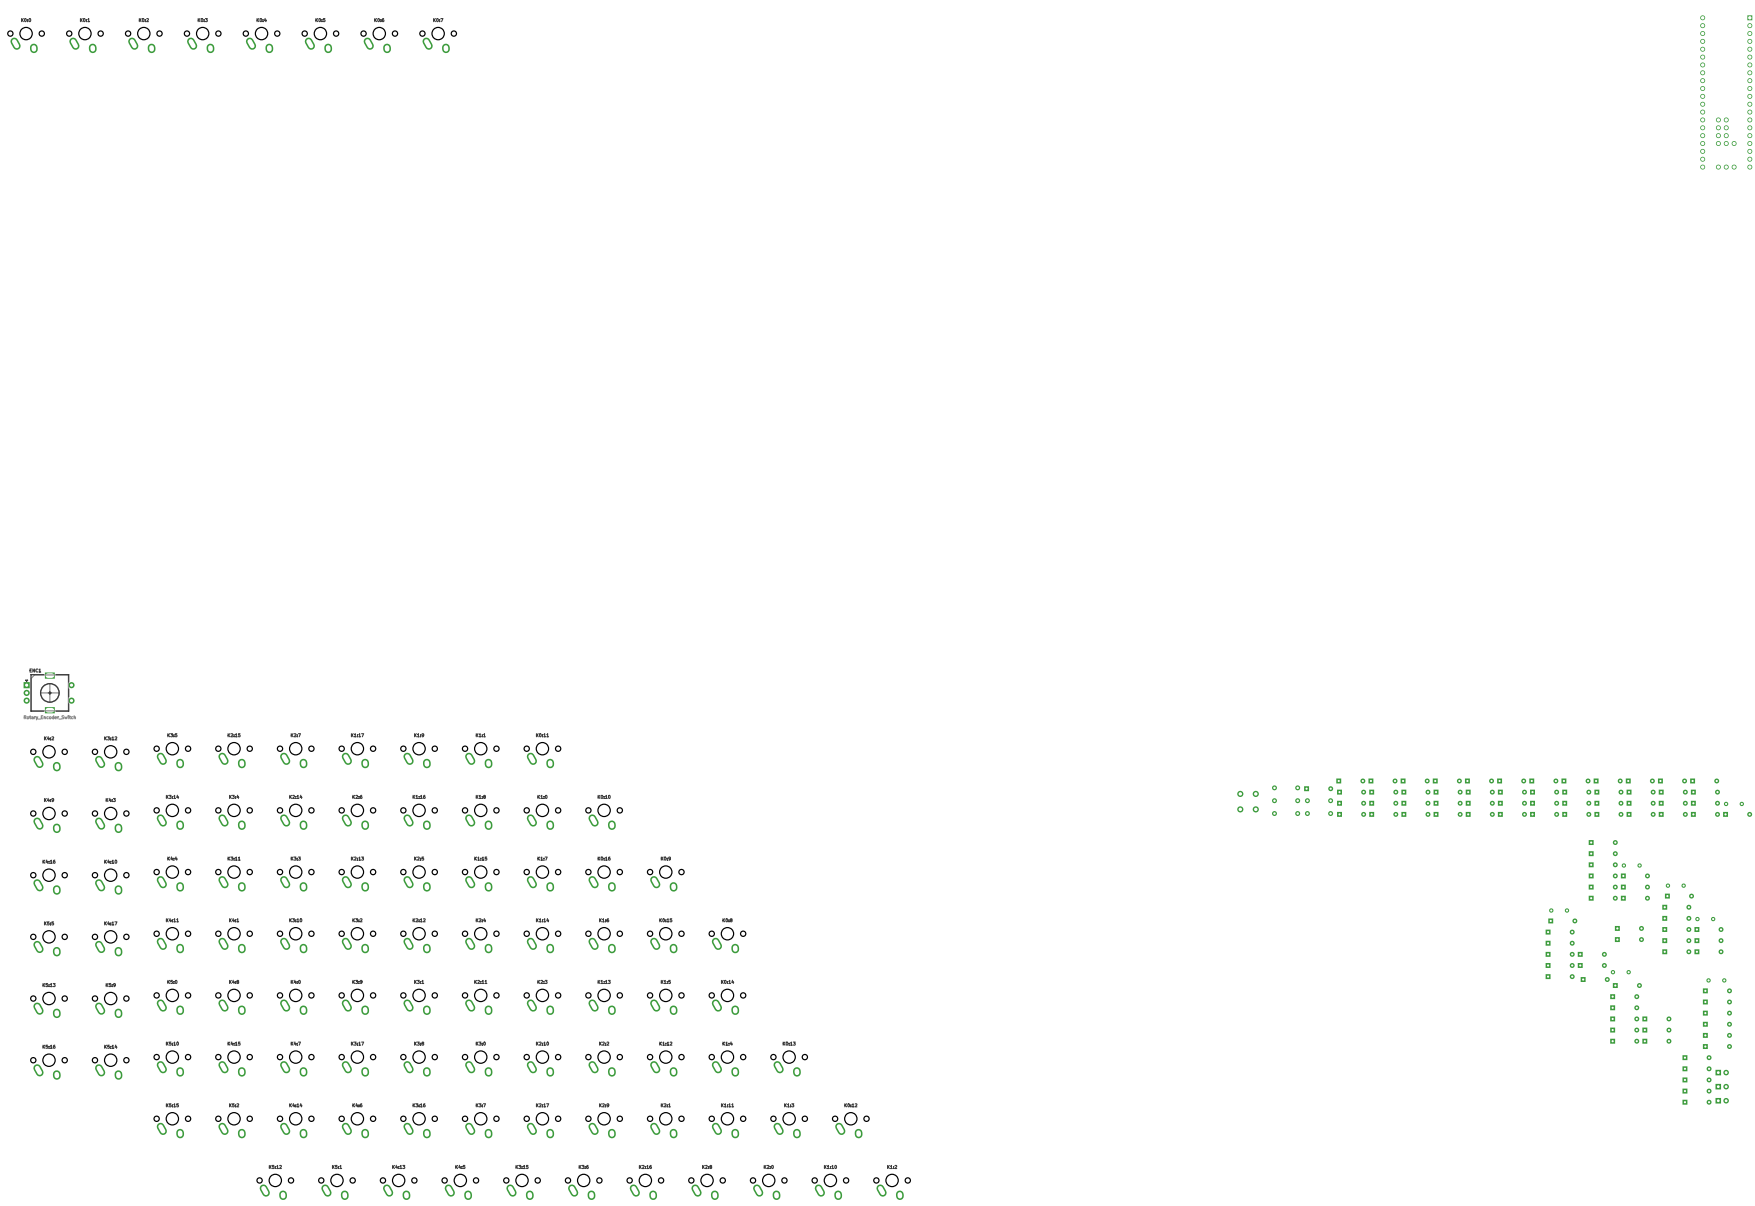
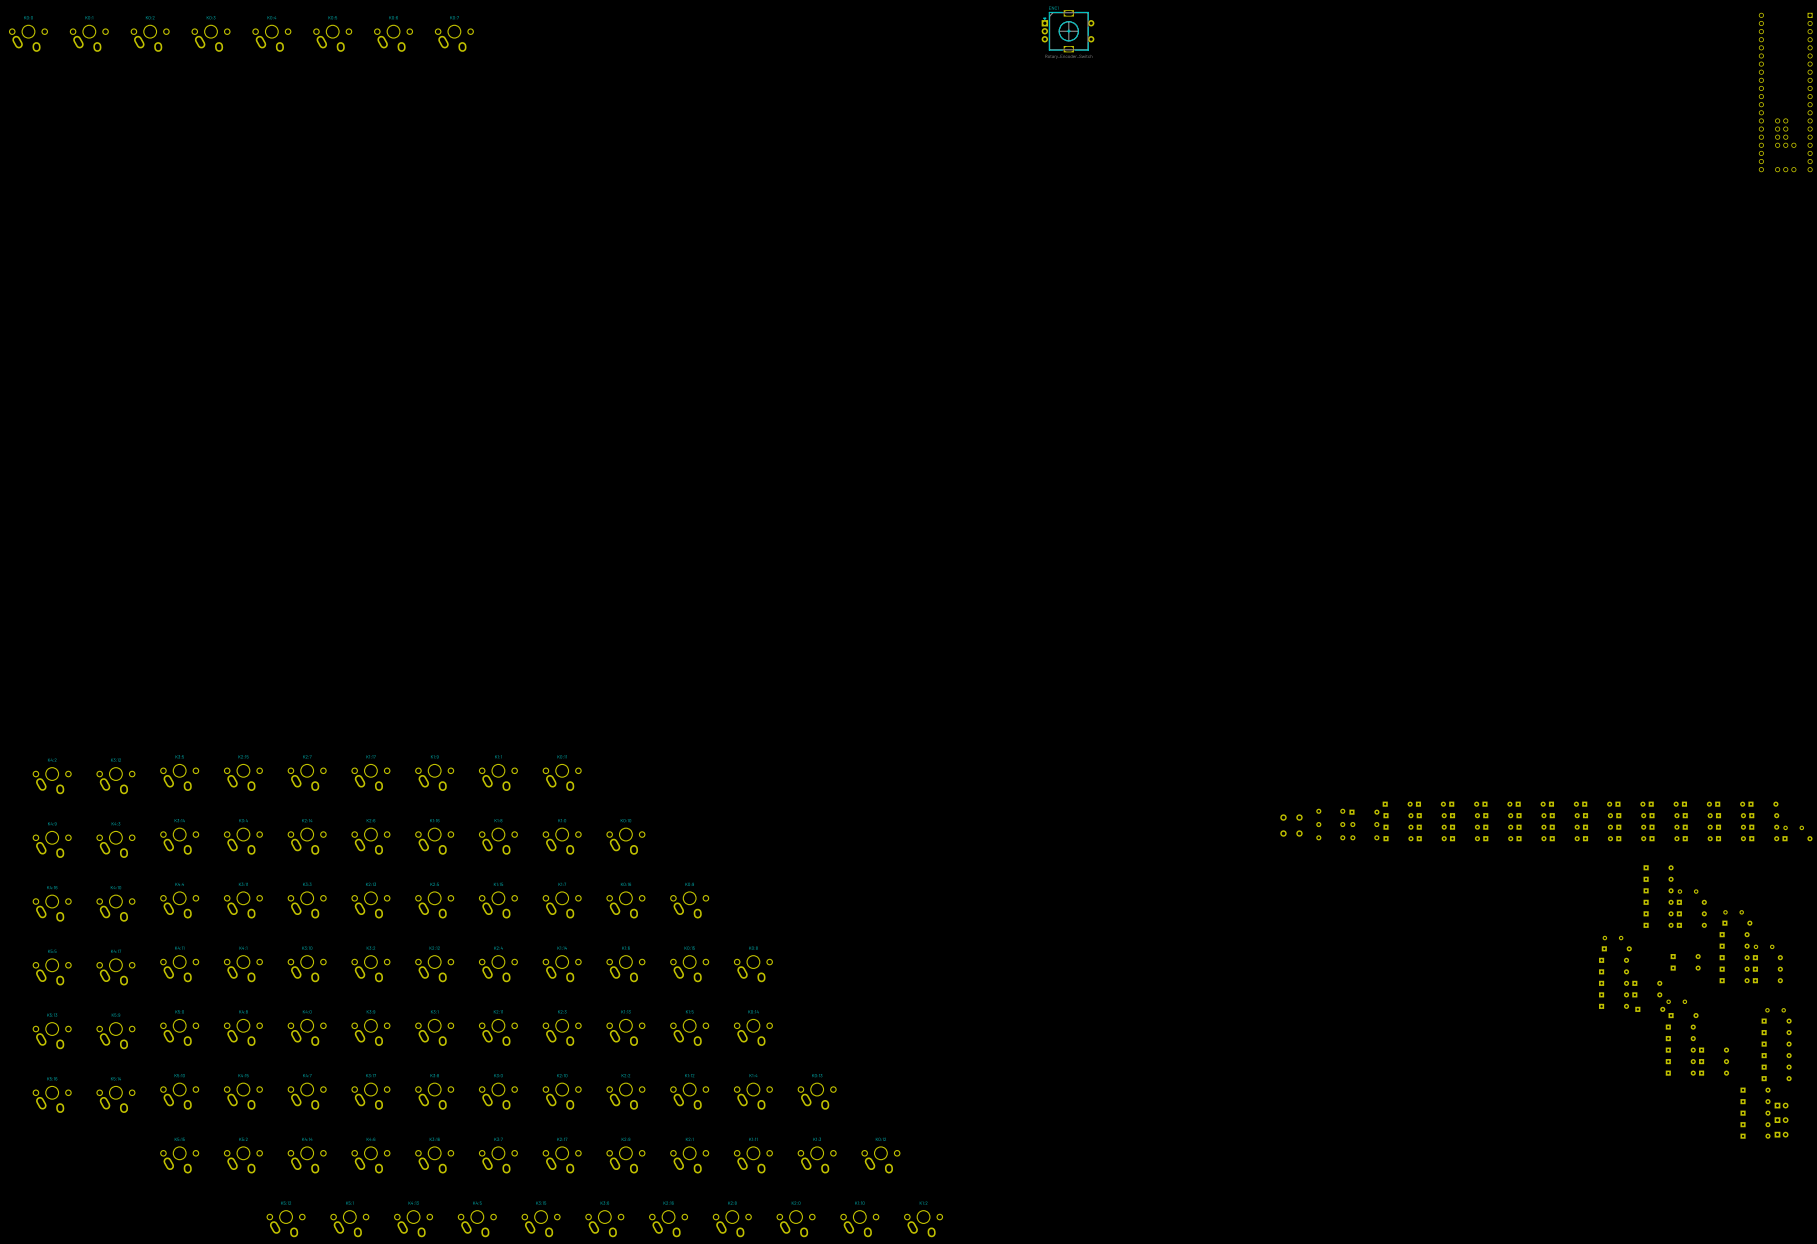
part position: (49, 692) -> (1068, 31)

